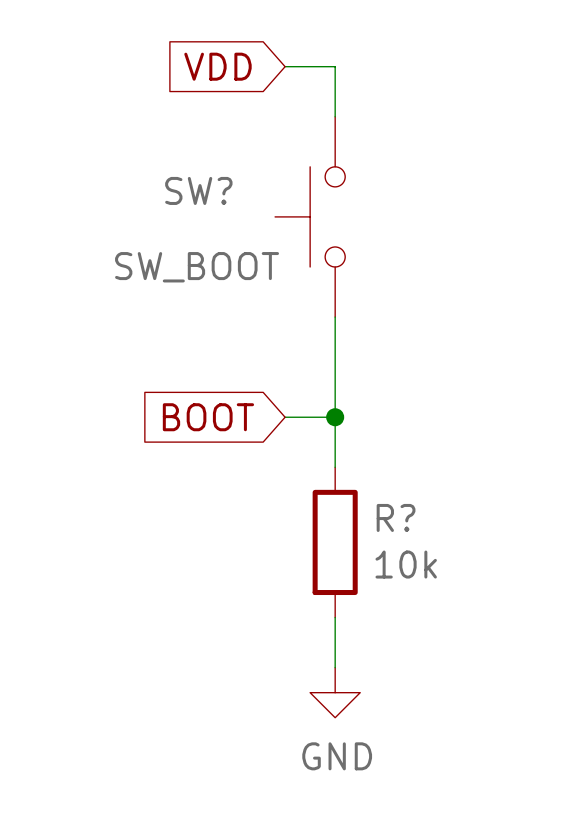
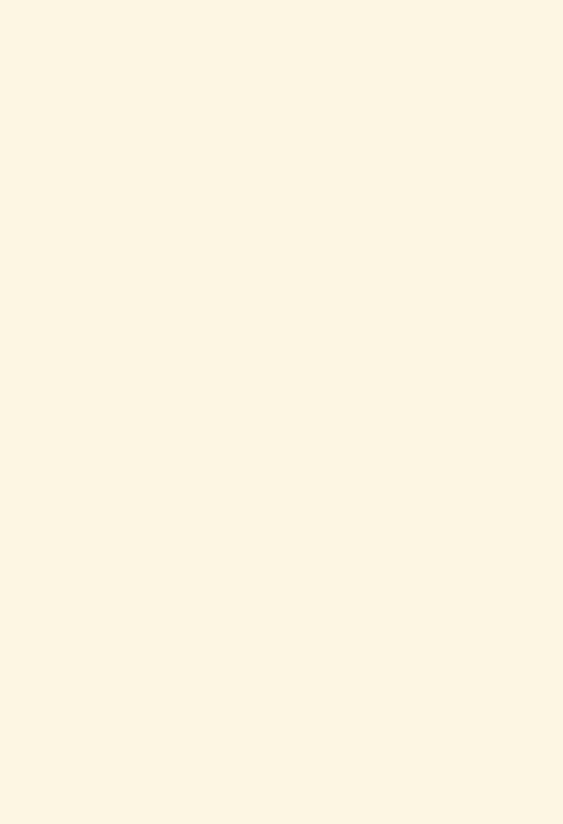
global label: VDD (217, 66) -> none
wire: (285, 66) (335, 66) (335, 116) -> none
SW?: SW_BOOT (310, 216) -> none
wire: (335, 317) (335, 467) -> none
global label: BOOT (208, 417) -> none
wire: (285, 417) (335, 417) -> none
junction: (335, 417) -> none
R?: 10k (335, 542) -> none
wire: (335, 617) (335, 667) -> none
power symbol: GND (335, 692) -> none

